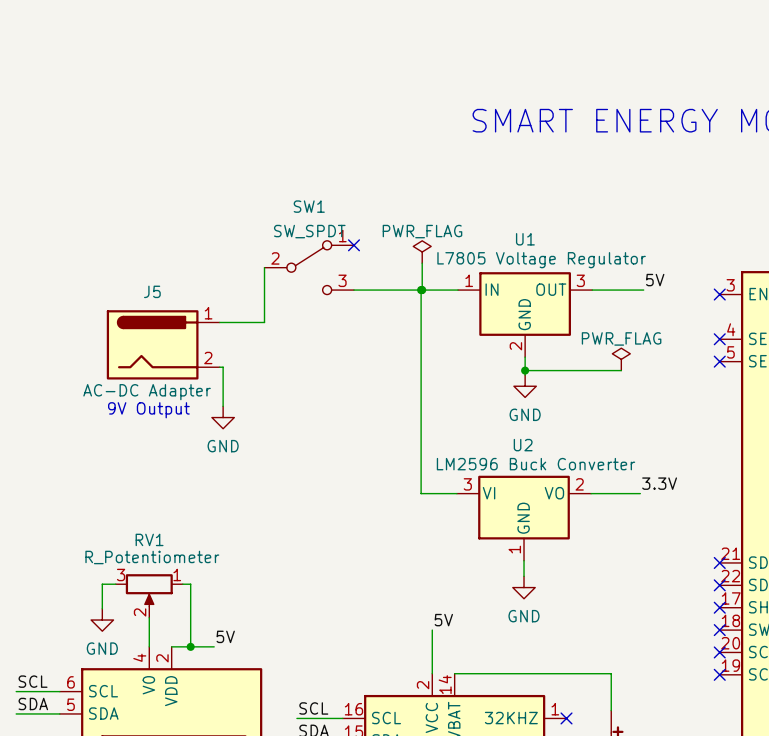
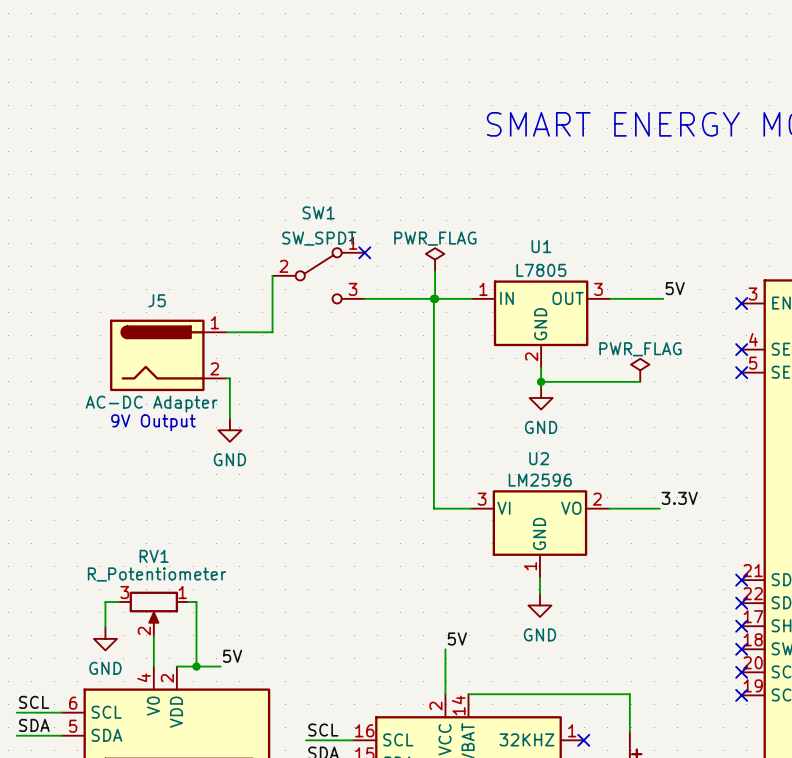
U1 value: L7805 Voltage Regulator (541, 260) -> L7805 (541, 270)
U2 value: LM2596 Buck Converter (535, 464) -> LM2596 (540, 480)

